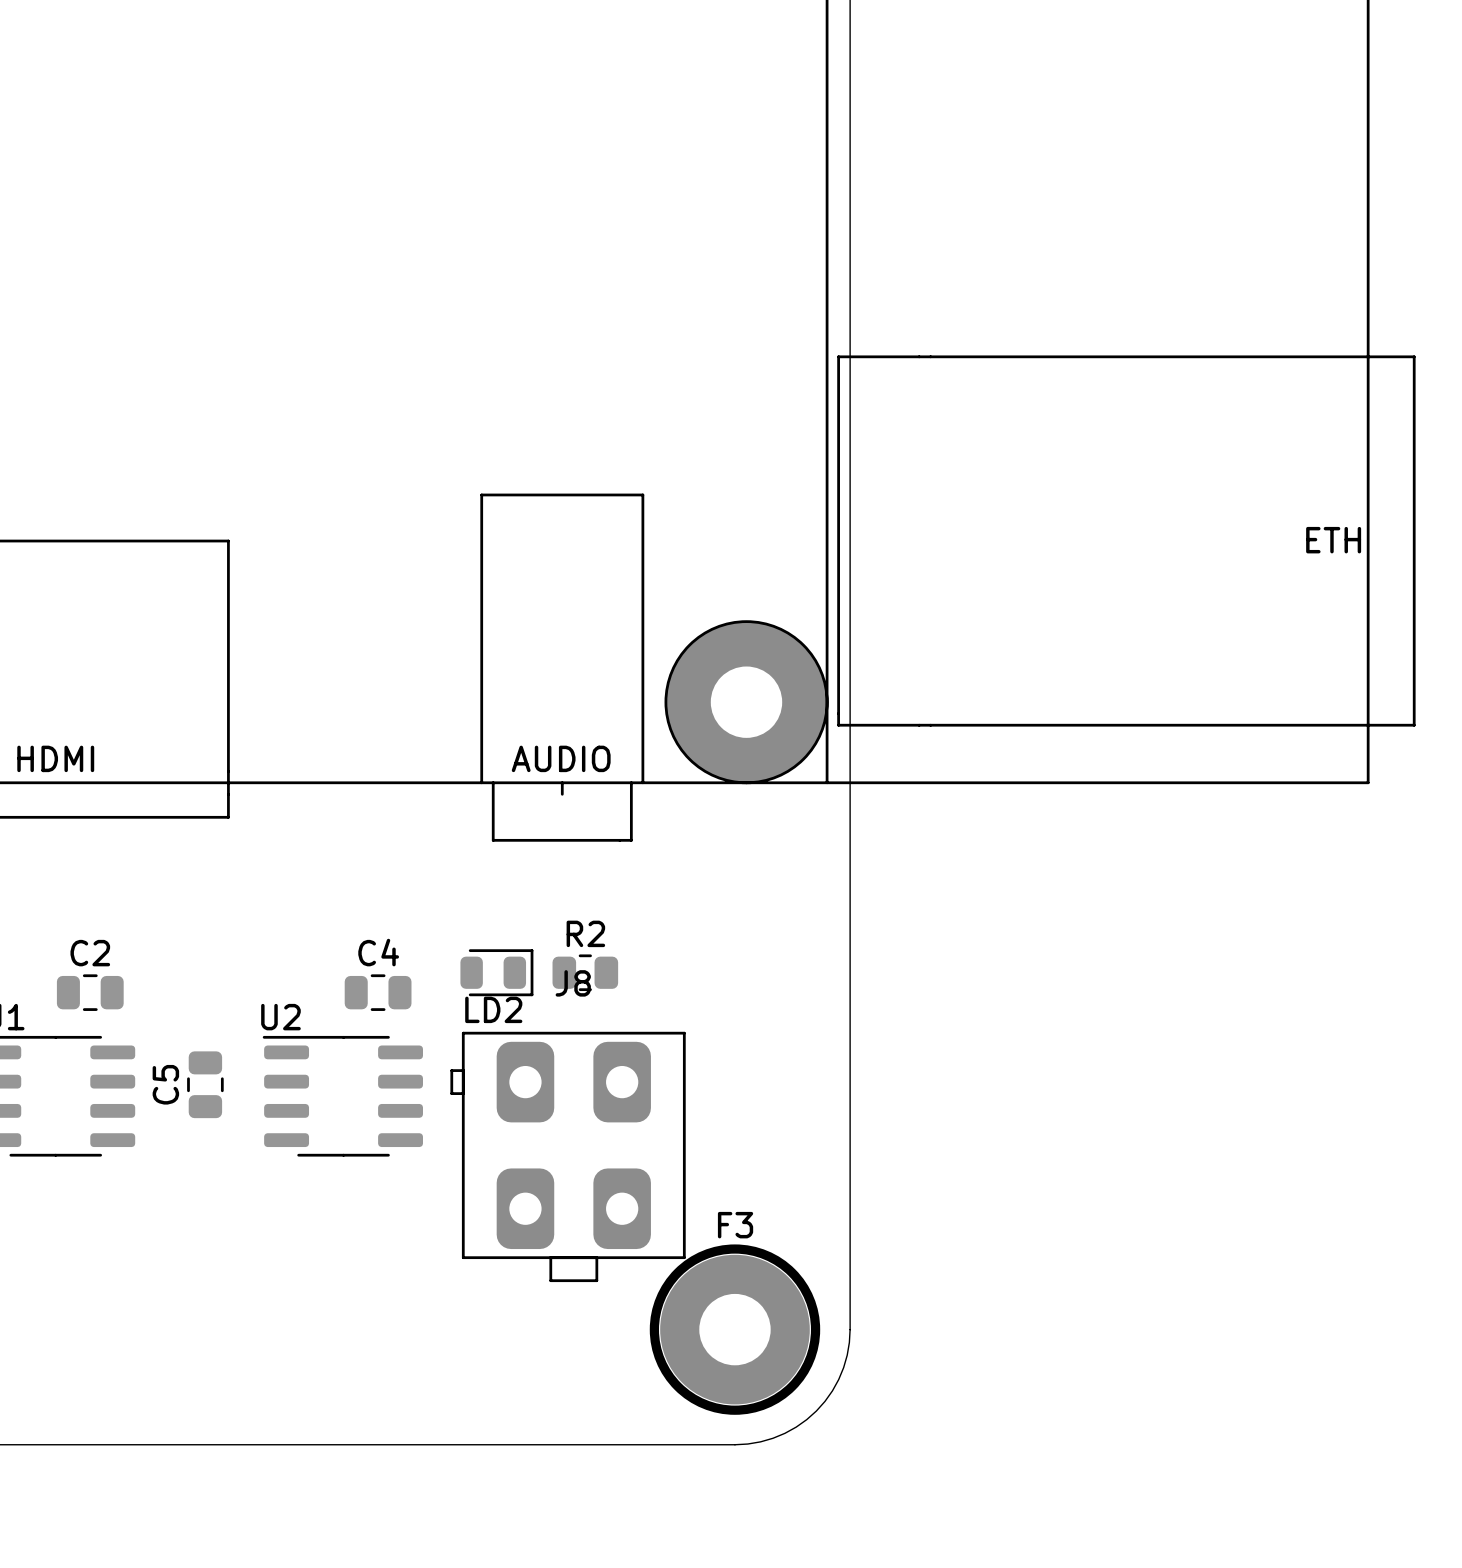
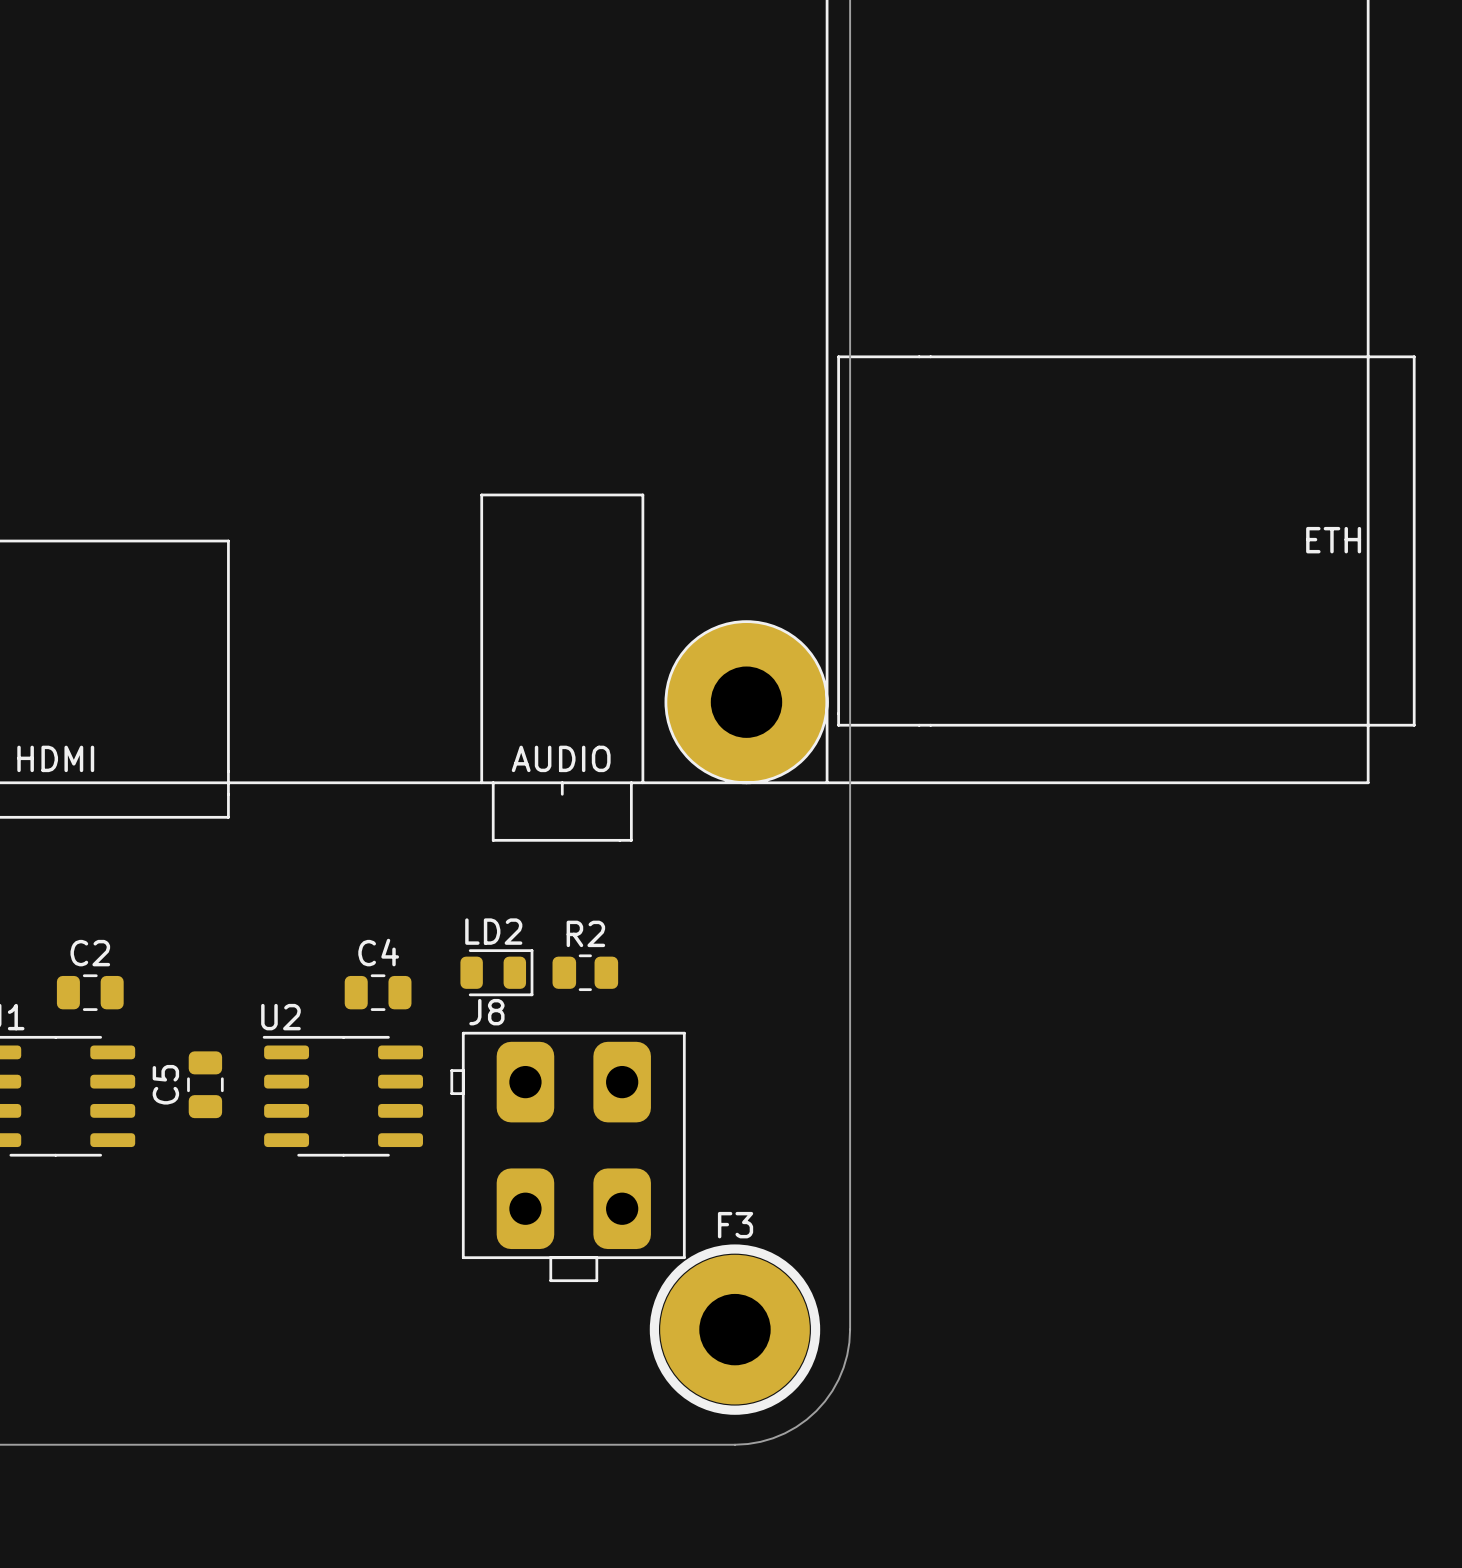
J8 name position: J8 (573, 983) -> J8 (486, 1012)
LD2 name position: LD2 (493, 1009) -> LD2 (493, 931)

